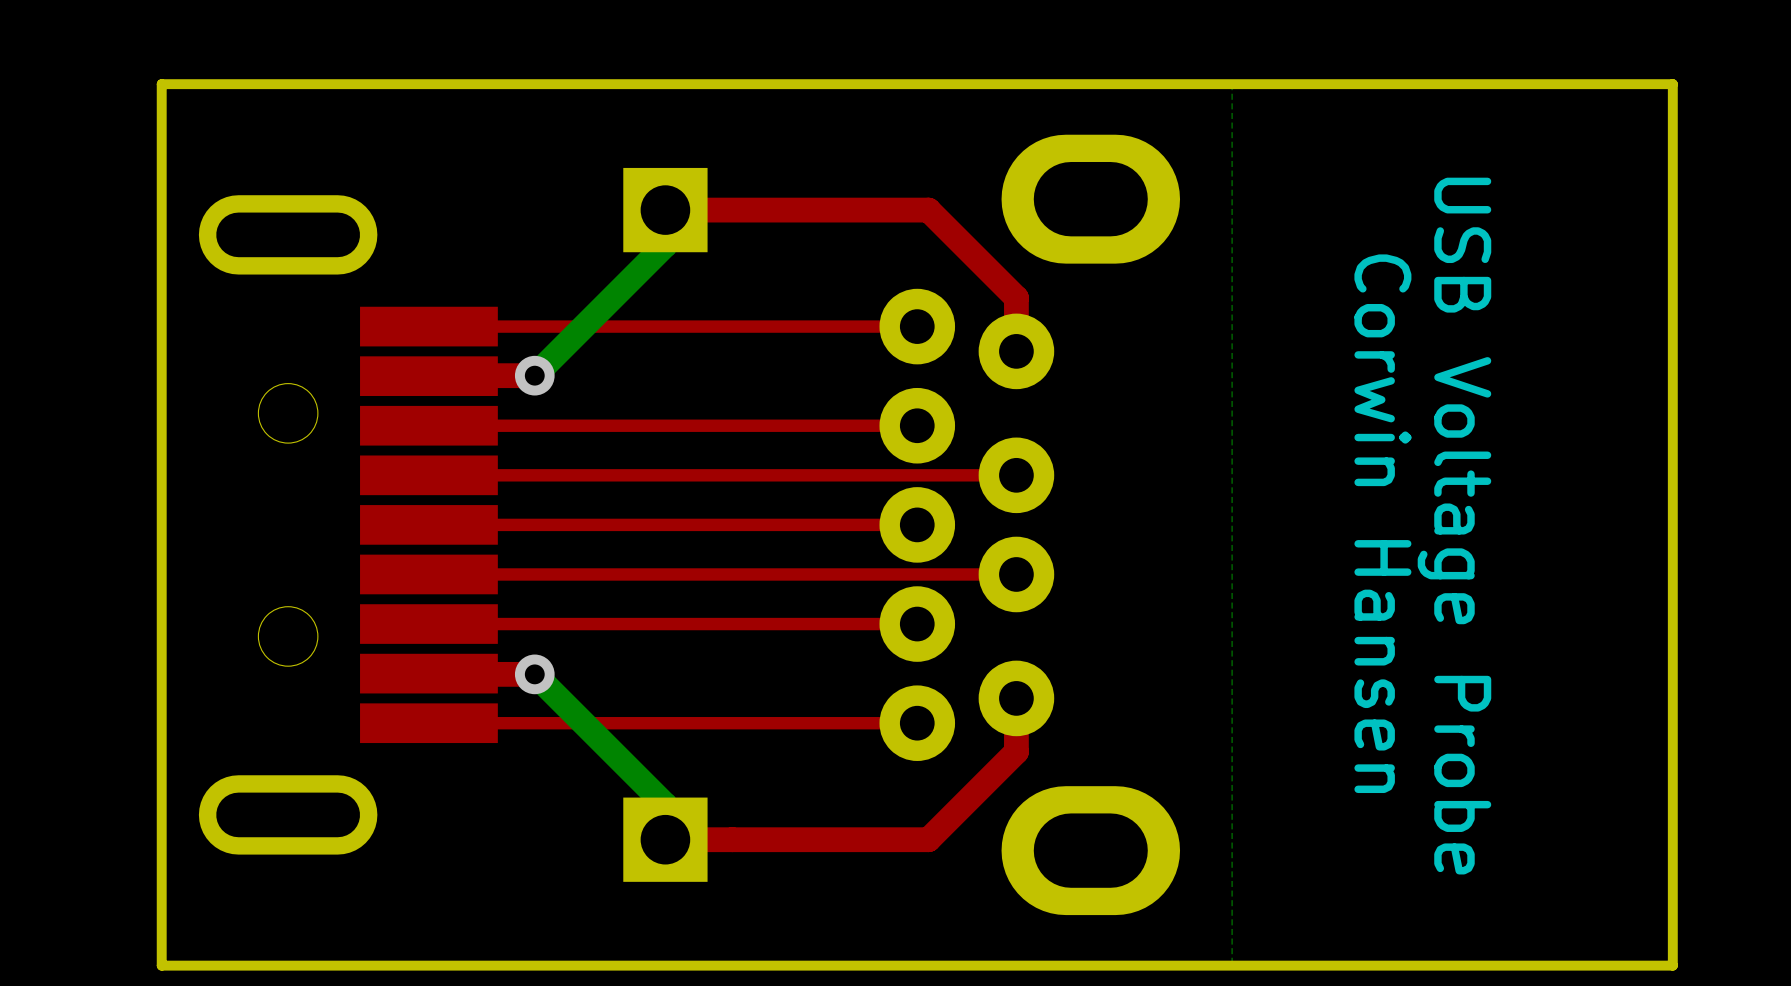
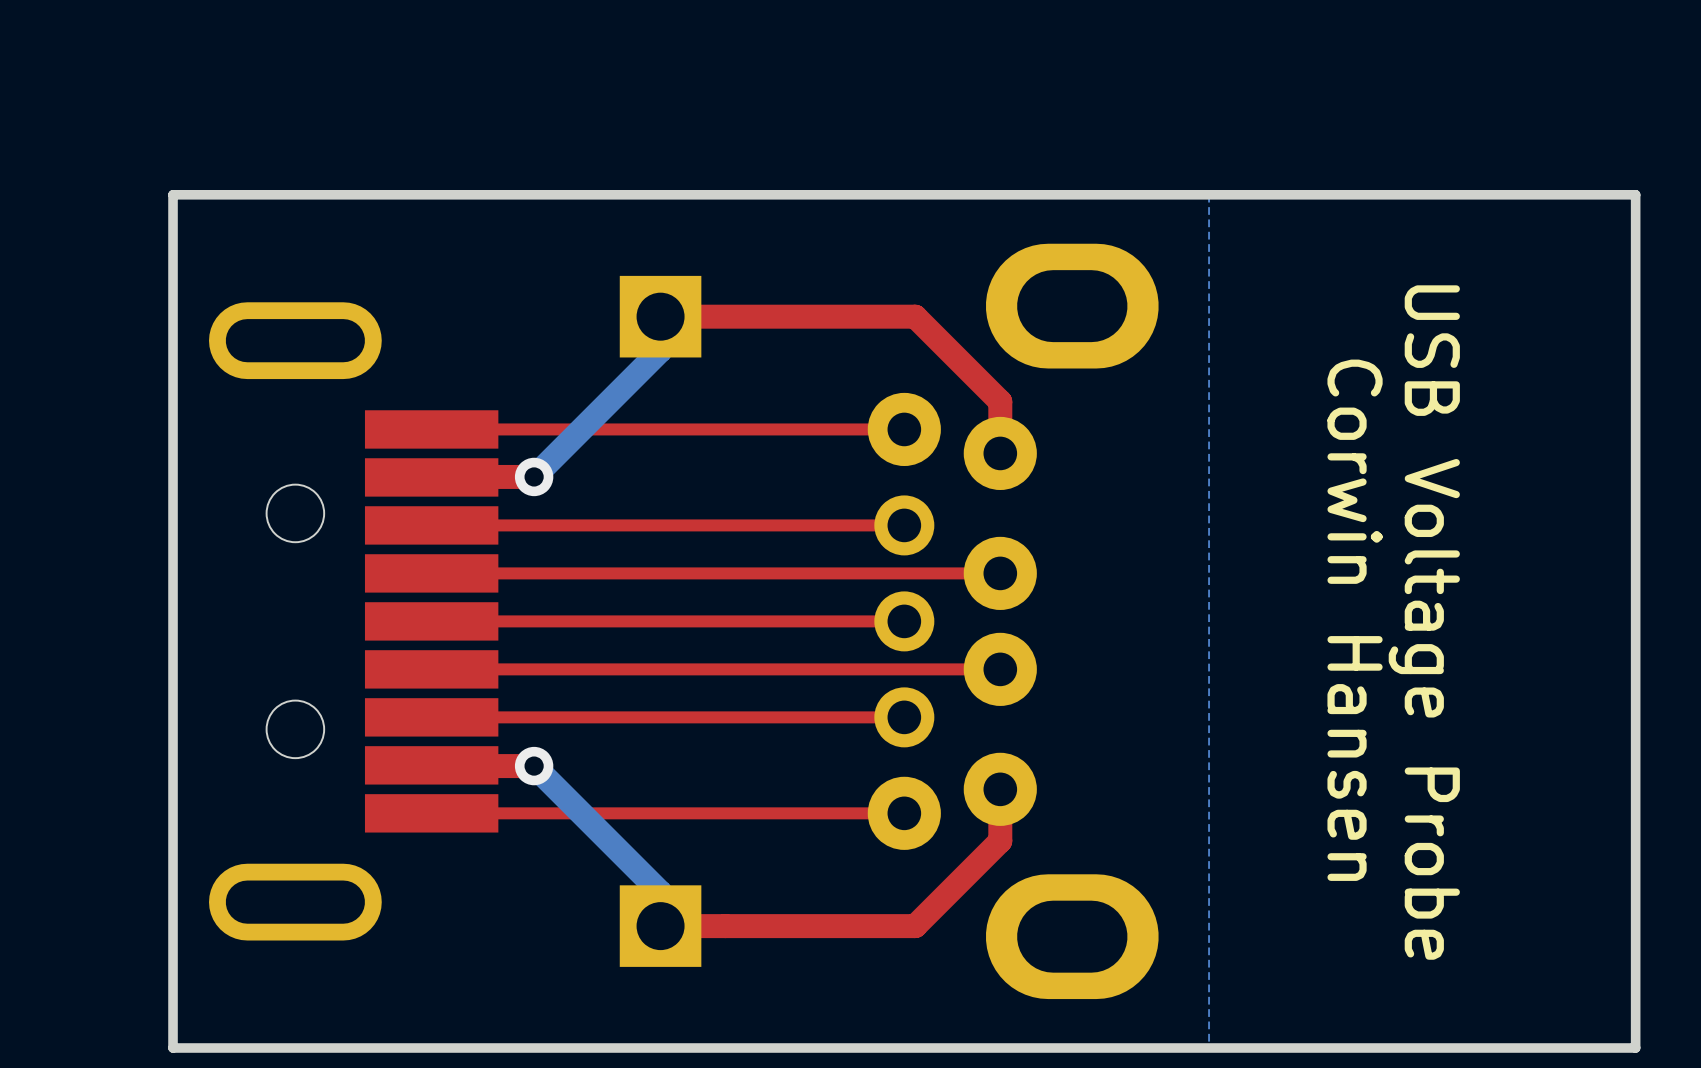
part footprint: [879, 134, 1181, 916] -> [867, 243, 1159, 1000]

